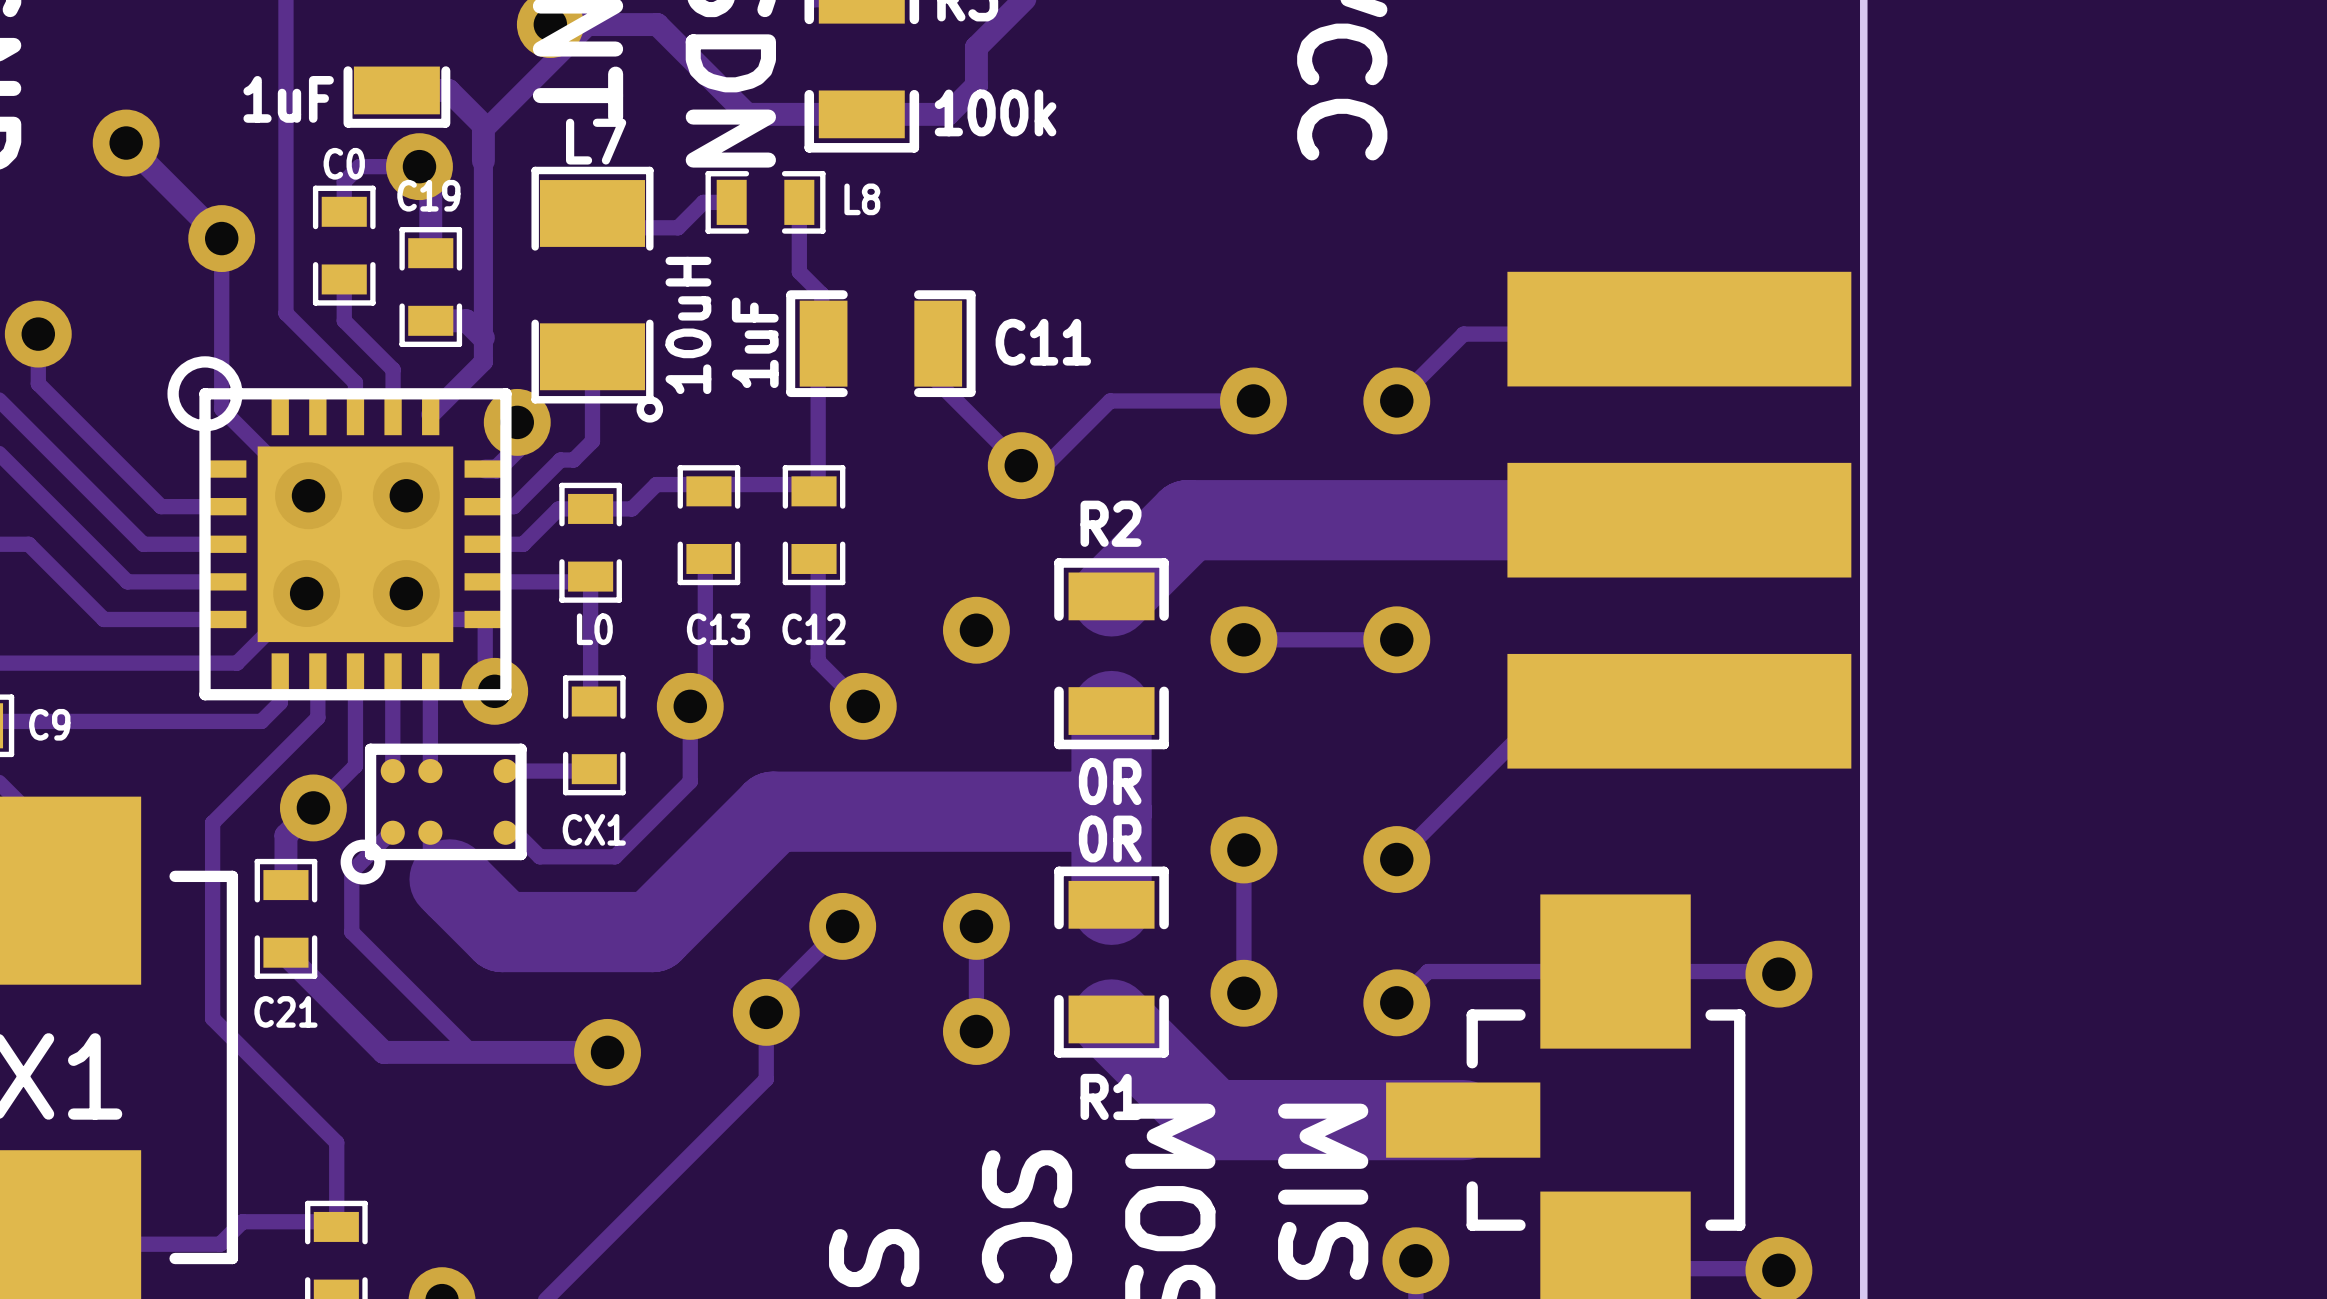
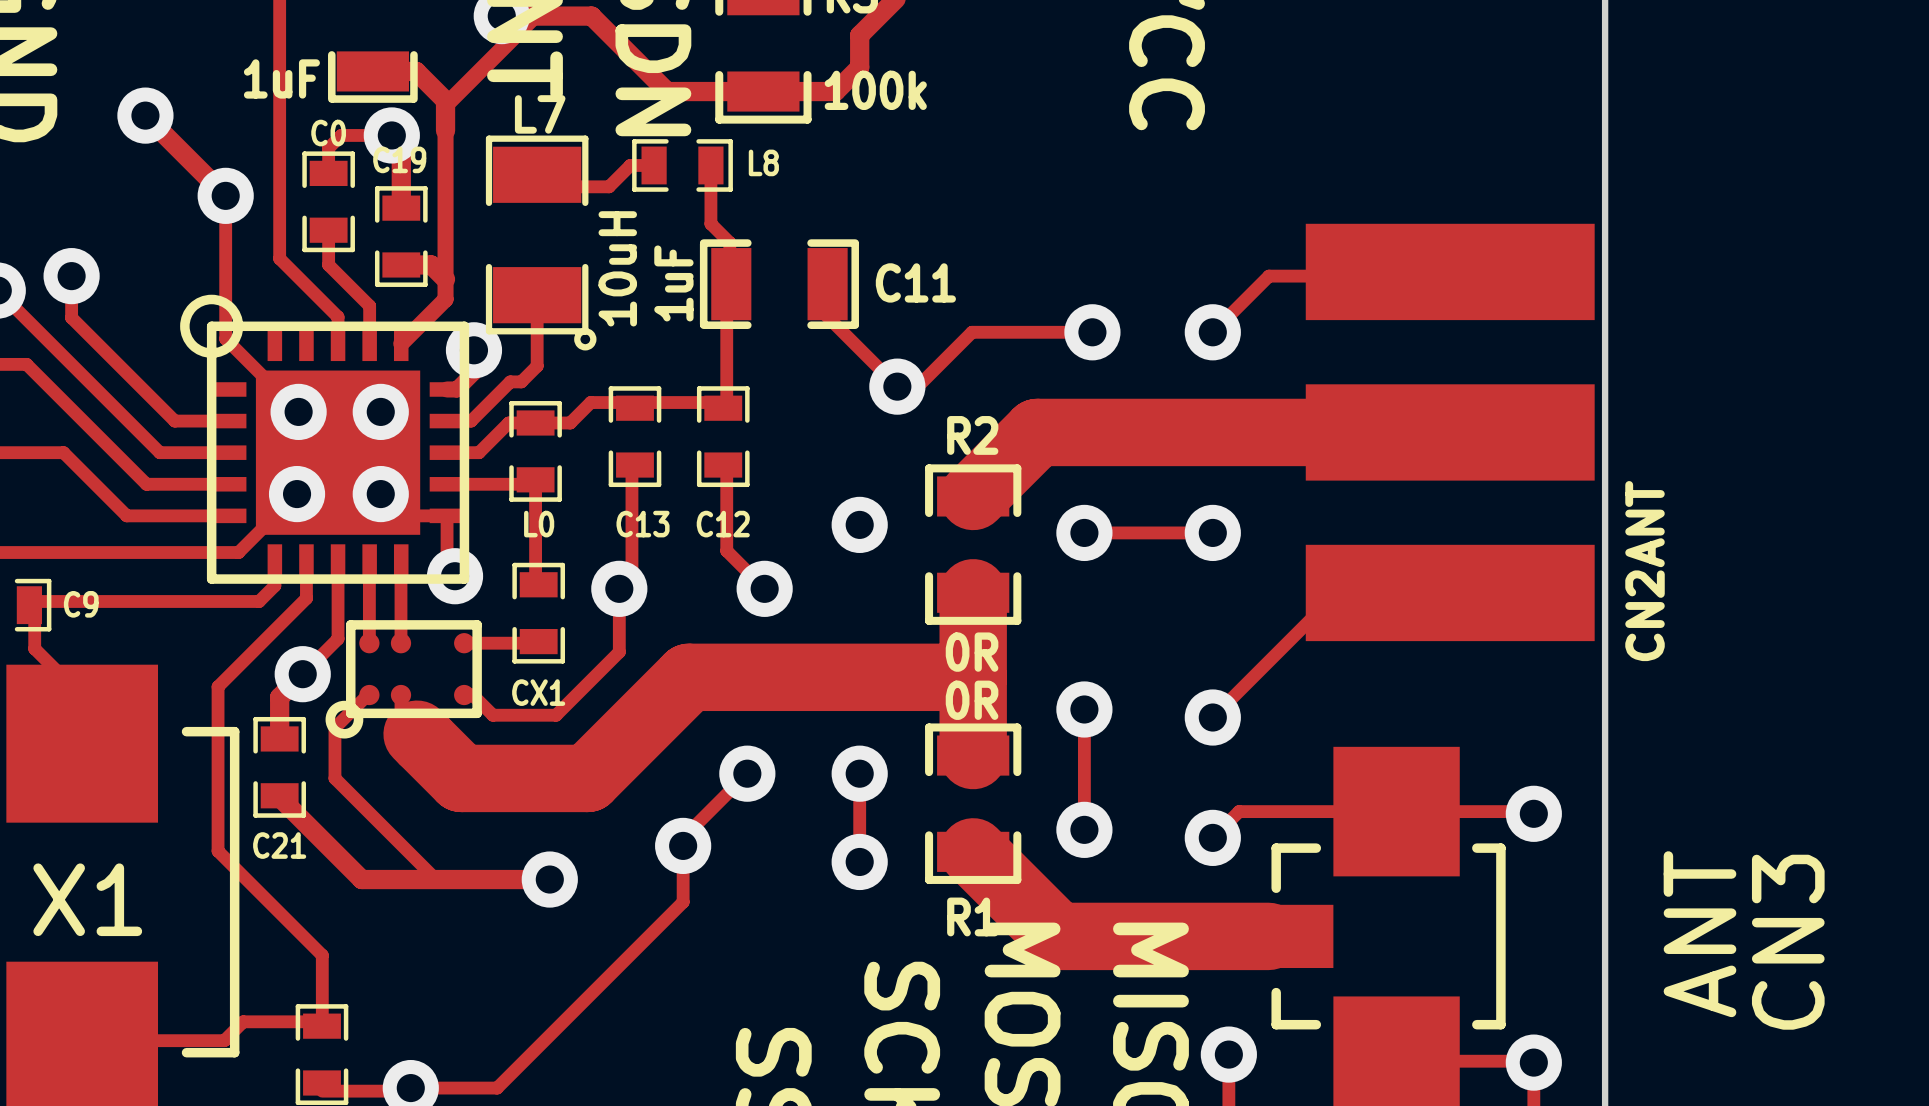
CN2 value: none -> ANT (1645, 524)
CN2 name: none -> CN2 (1645, 615)
CN3 value: none -> ANT (1700, 934)
CN3 name: none -> CN3 (1788, 942)

